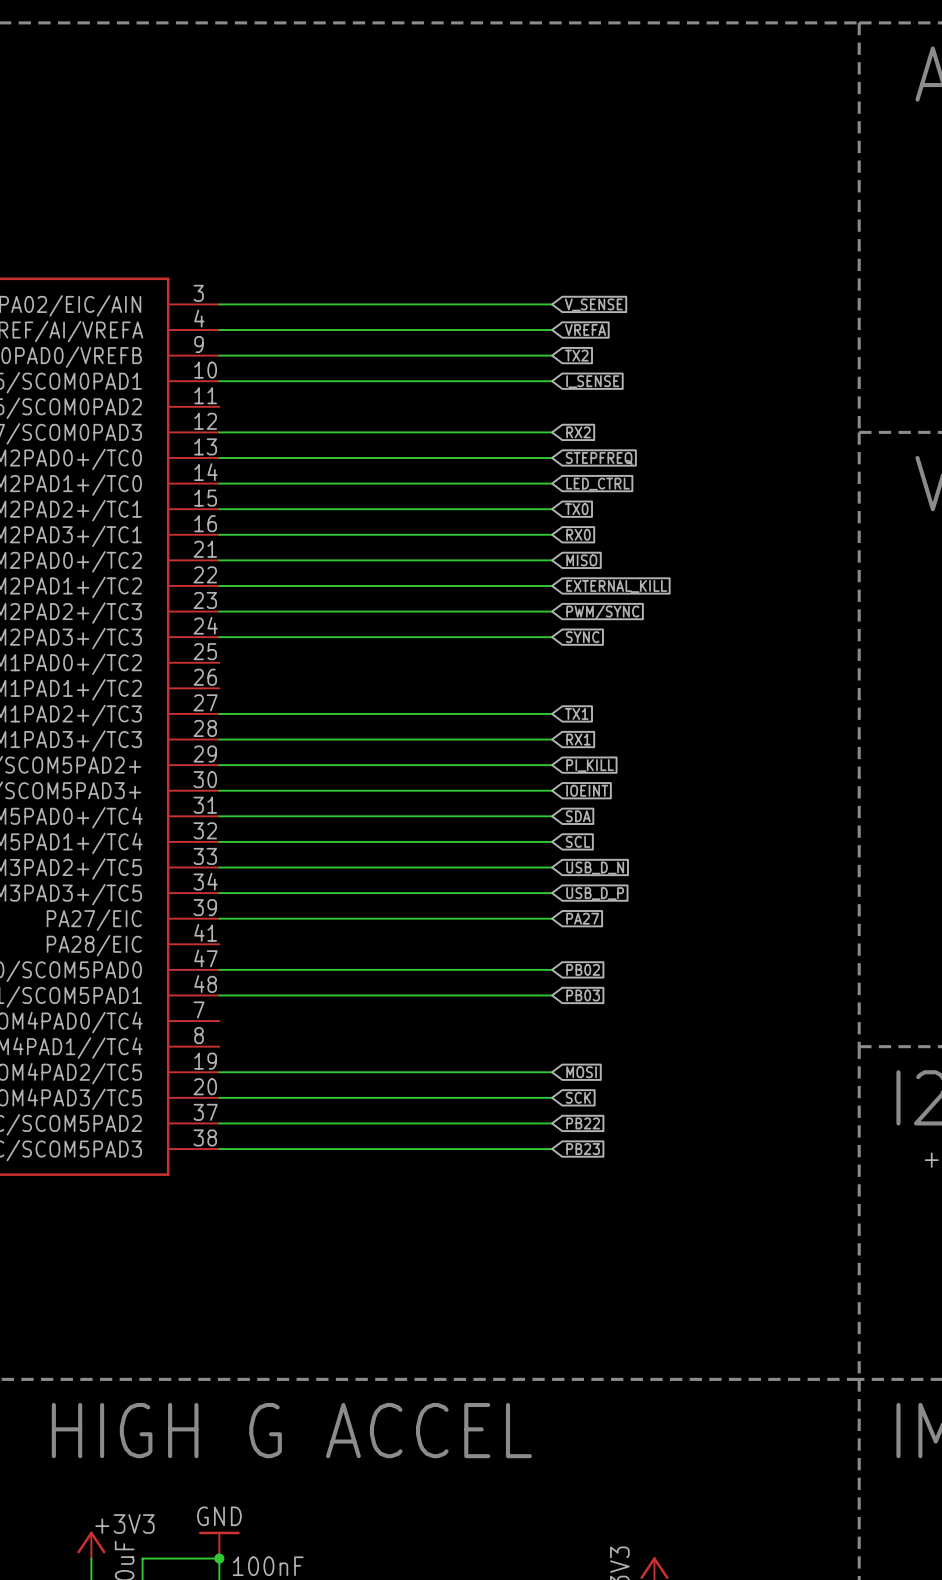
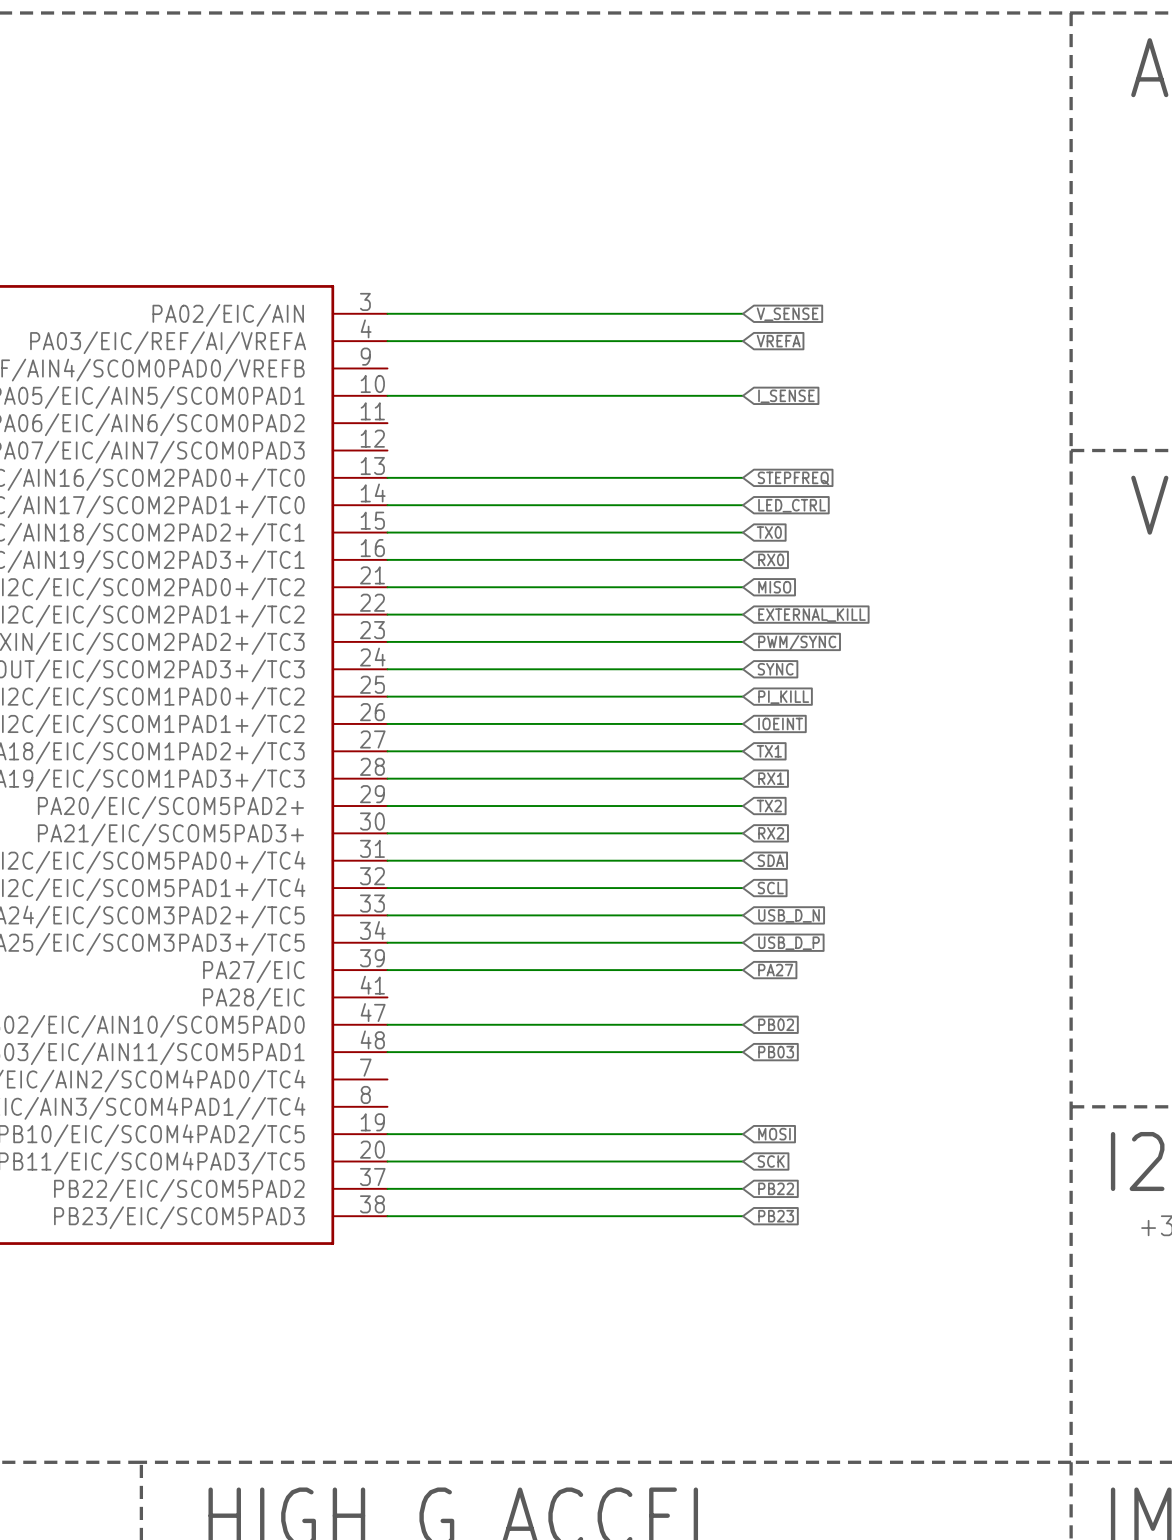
wire: (219, 355) (552, 355) -> none
global label: TX2 (576, 355) -> none
wire: (219, 432) (552, 432) -> (387, 696) (742, 696)
global label: RX2 (578, 432) -> none
global label: none -> PI_KILL (783, 697)
wire: none -> (387, 723) (742, 723)
global label: none -> IOEINT (780, 723)
global label: PI_KILL (590, 765) -> TX2 (769, 806)
global label: IOEINT (587, 790) -> RX2 (771, 833)

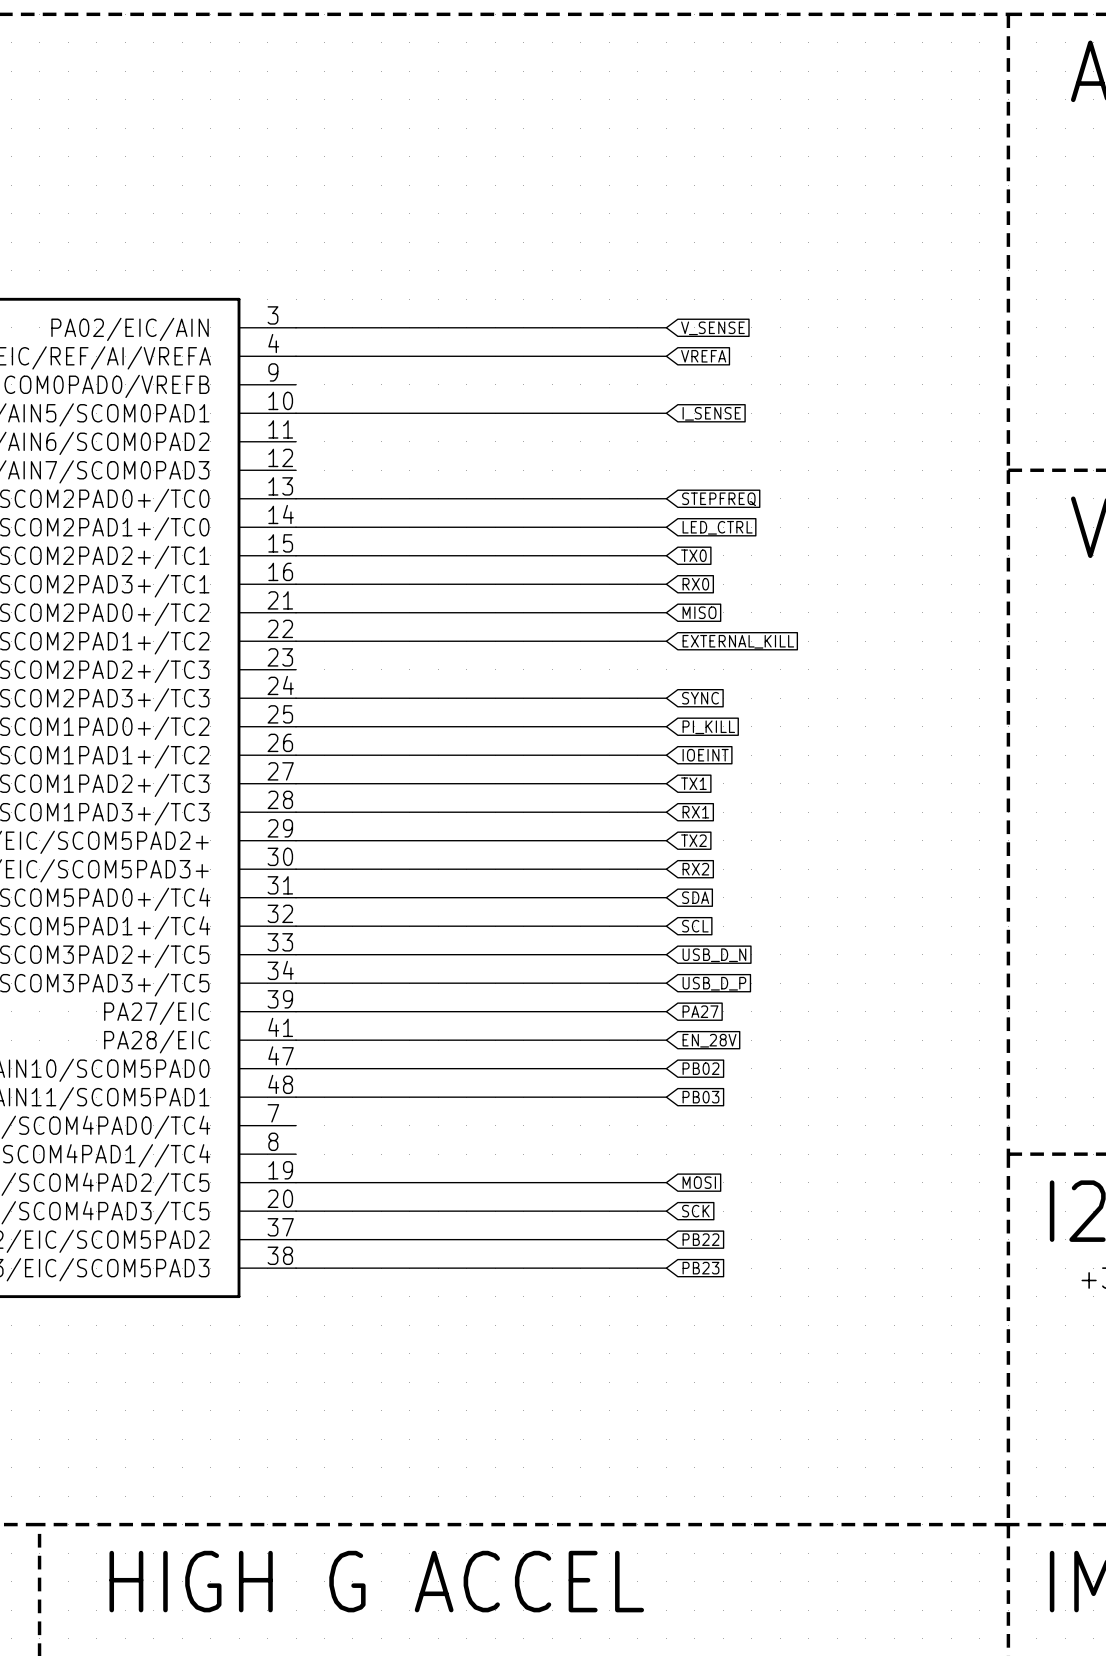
wire: (387, 641) (742, 641) -> none
global label: PWM/SYNC (797, 642) -> none
wire: none -> (296, 1040) (666, 1040)
global label: none -> EN_28V (709, 1040)

